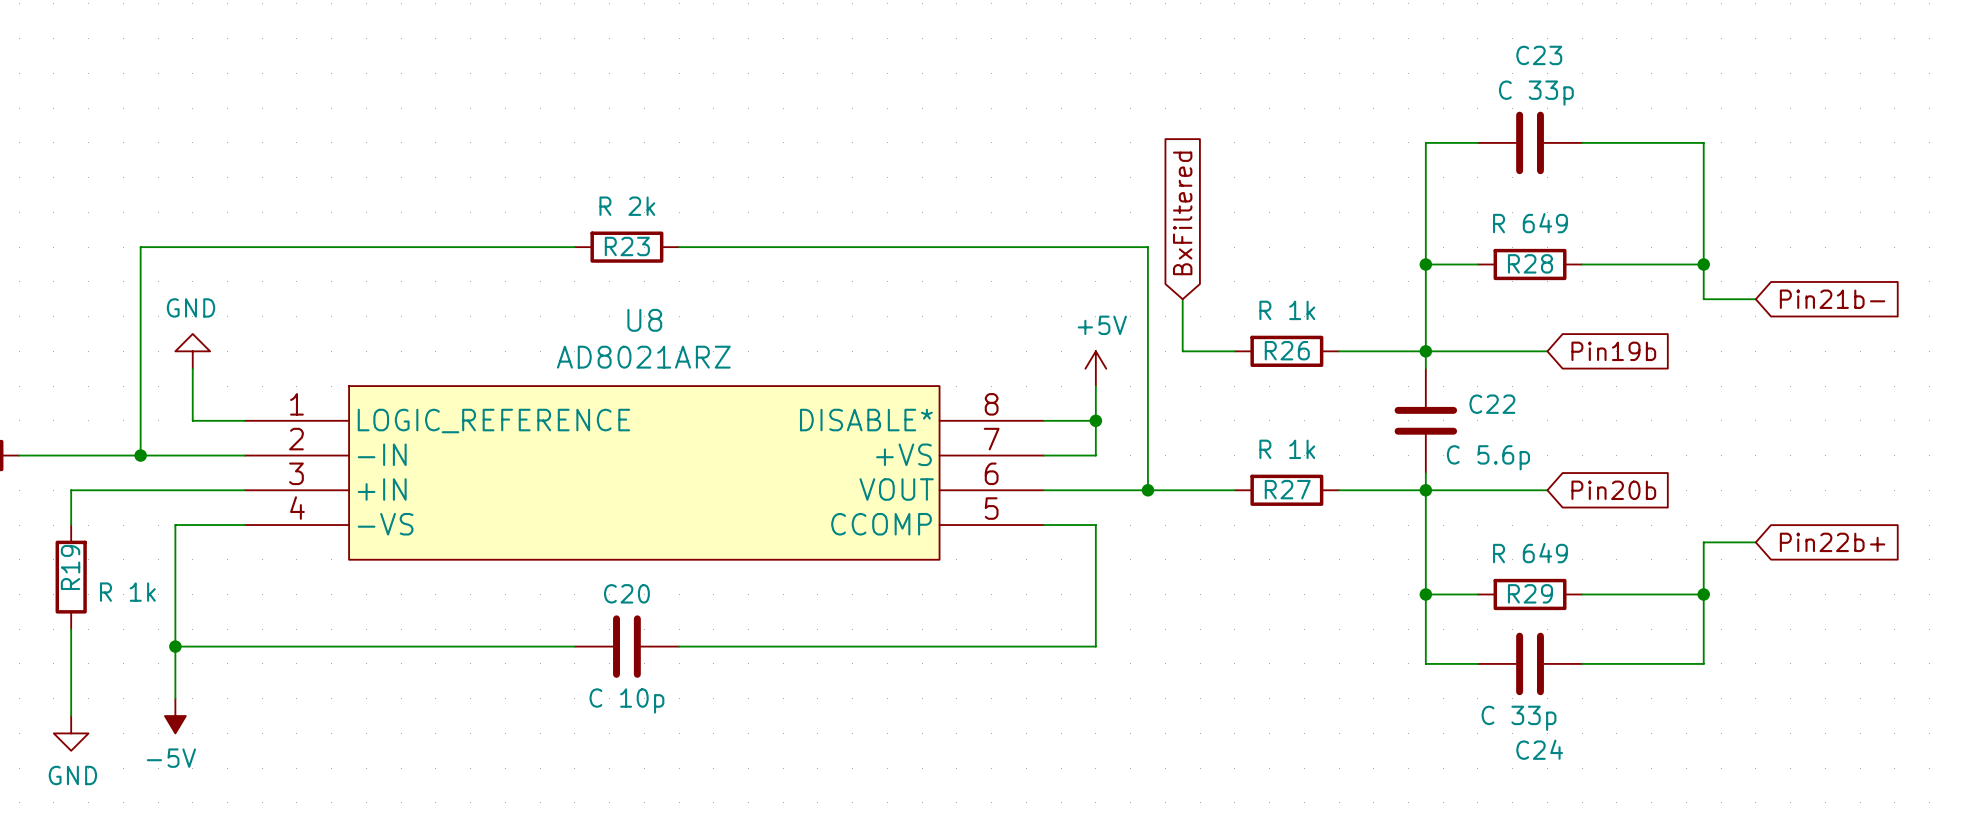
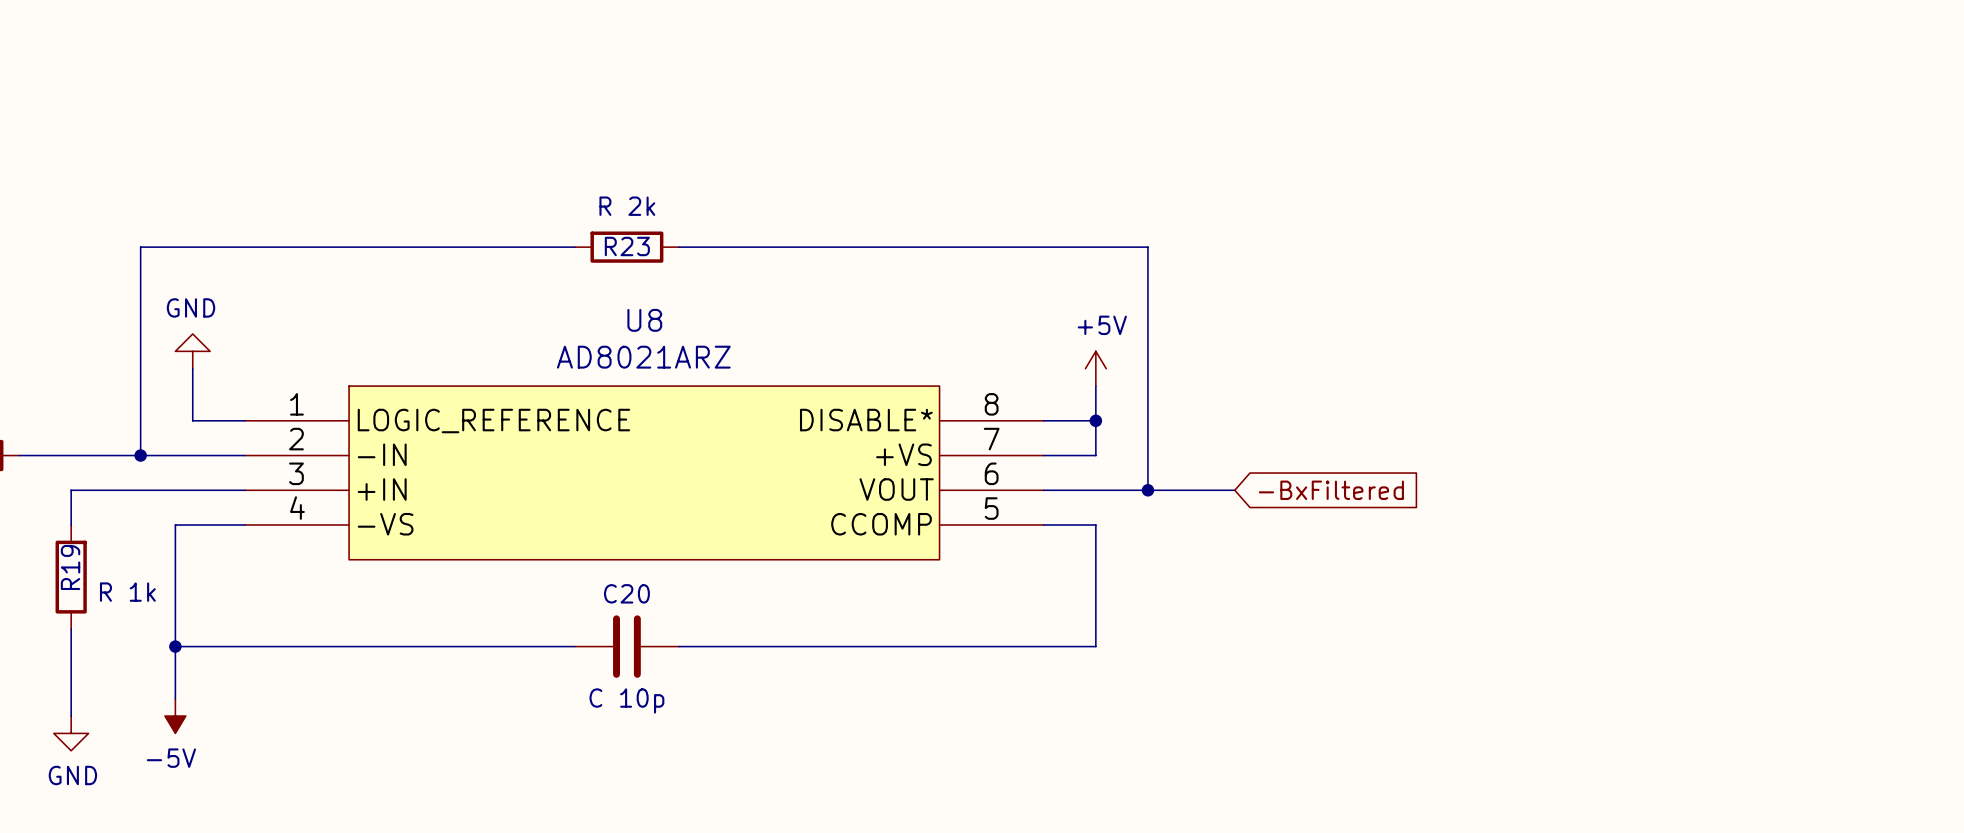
wire: (1477, 142) (1425, 142) (1425, 368) -> none
C23: C 33p (1530, 142) -> none
wire: (1582, 142) (1703, 142) (1703, 299) (1755, 299) -> none
global label: BxFiltered (1182, 213) -> none
wire: (1425, 264) (1477, 264) -> none
junction: (1425, 264) -> none
R28: R 649 (1530, 264) -> none
wire: (1582, 264) (1703, 264) -> none
junction: (1703, 264) -> none
wire: (1182, 299) (1182, 351) (1234, 351) -> none
global label: Pin21b- (1832, 299) -> none
R26: R 1k (1286, 351) -> none
wire: (1339, 351) (1547, 351) -> none
junction: (1425, 351) -> none
global label: Pin19b (1613, 351) -> none
C22: C 5.6p (1425, 420) -> none
wire: (1425, 472) (1425, 663) (1477, 663) -> none
R27: R 1k (1286, 490) -> none
global label: none -> -BxFiltered (1331, 490)
wire: (1339, 490) (1547, 490) -> none
junction: (1425, 490) -> none
global label: Pin20b (1613, 490) -> none
wire: (1755, 542) (1703, 542) (1703, 663) (1582, 663) -> none
global label: Pin22b+ (1832, 542) -> none
wire: (1425, 594) (1477, 594) -> none
junction: (1425, 594) -> none
R29: R 649 (1530, 594) -> none
wire: (1582, 594) (1703, 594) -> none
junction: (1703, 594) -> none
C24: C 33p (1530, 663) -> none

